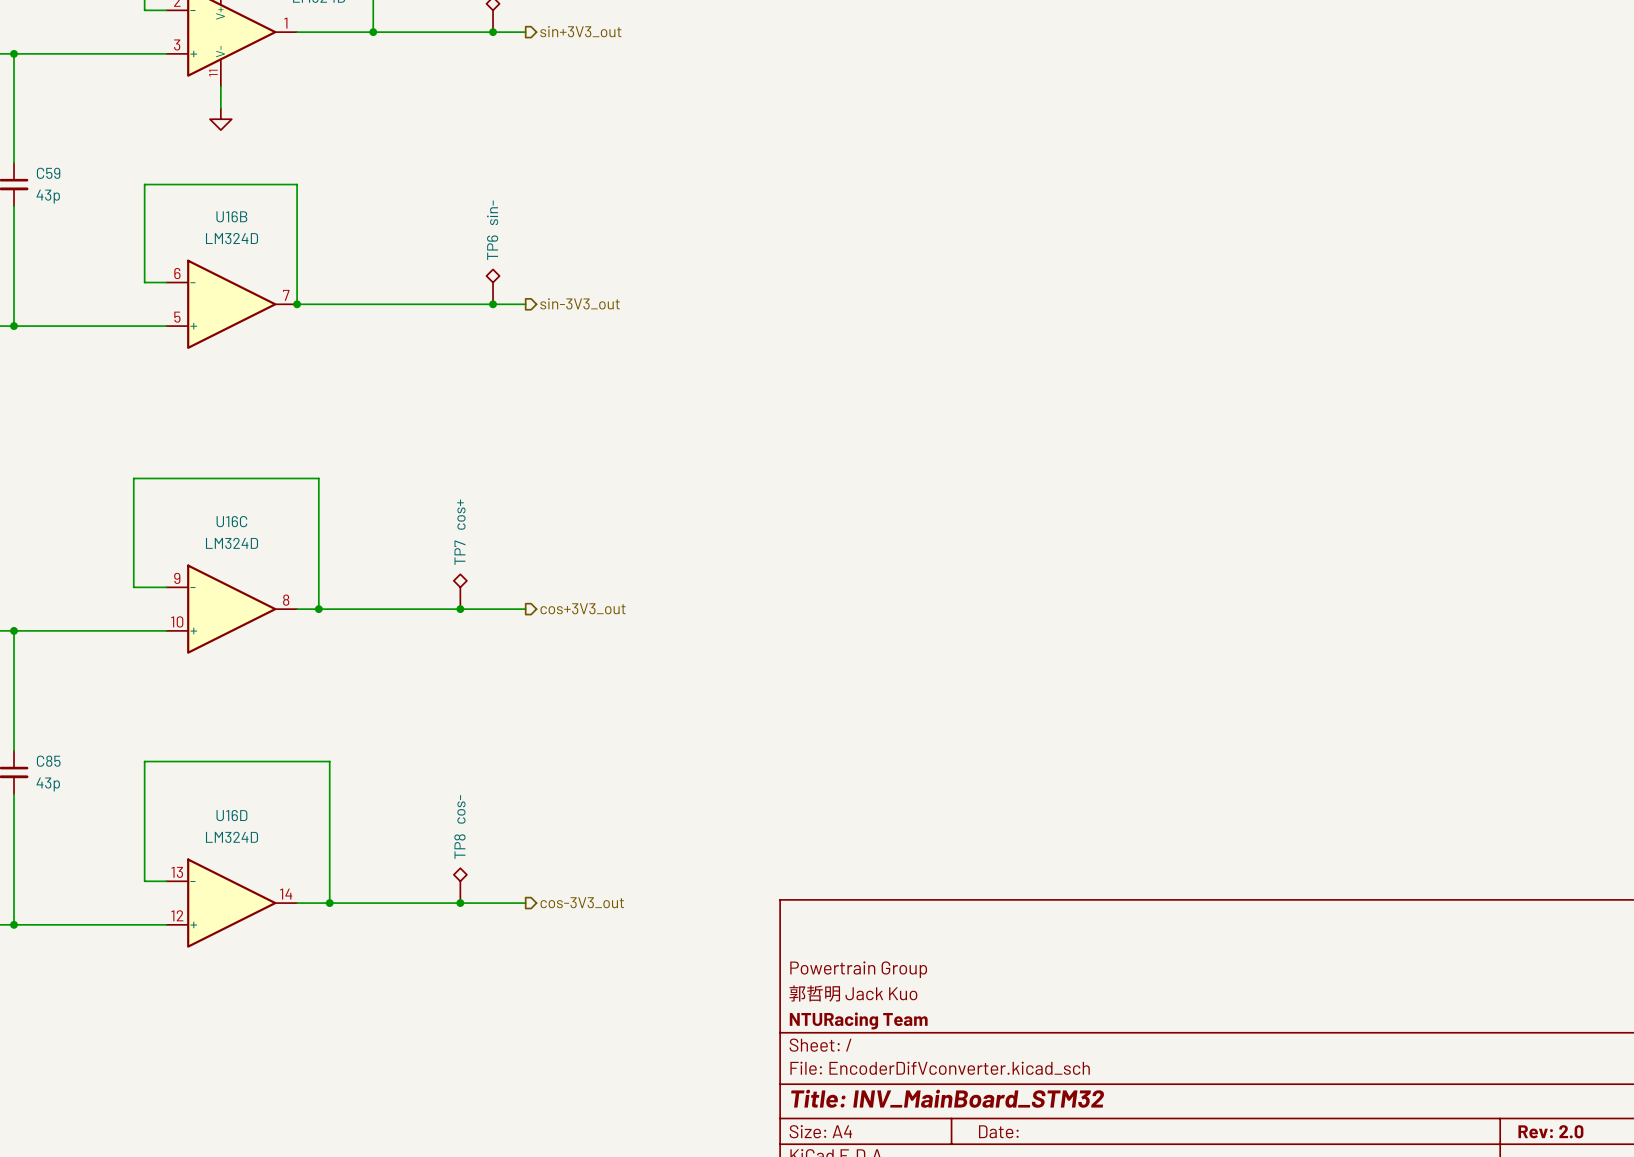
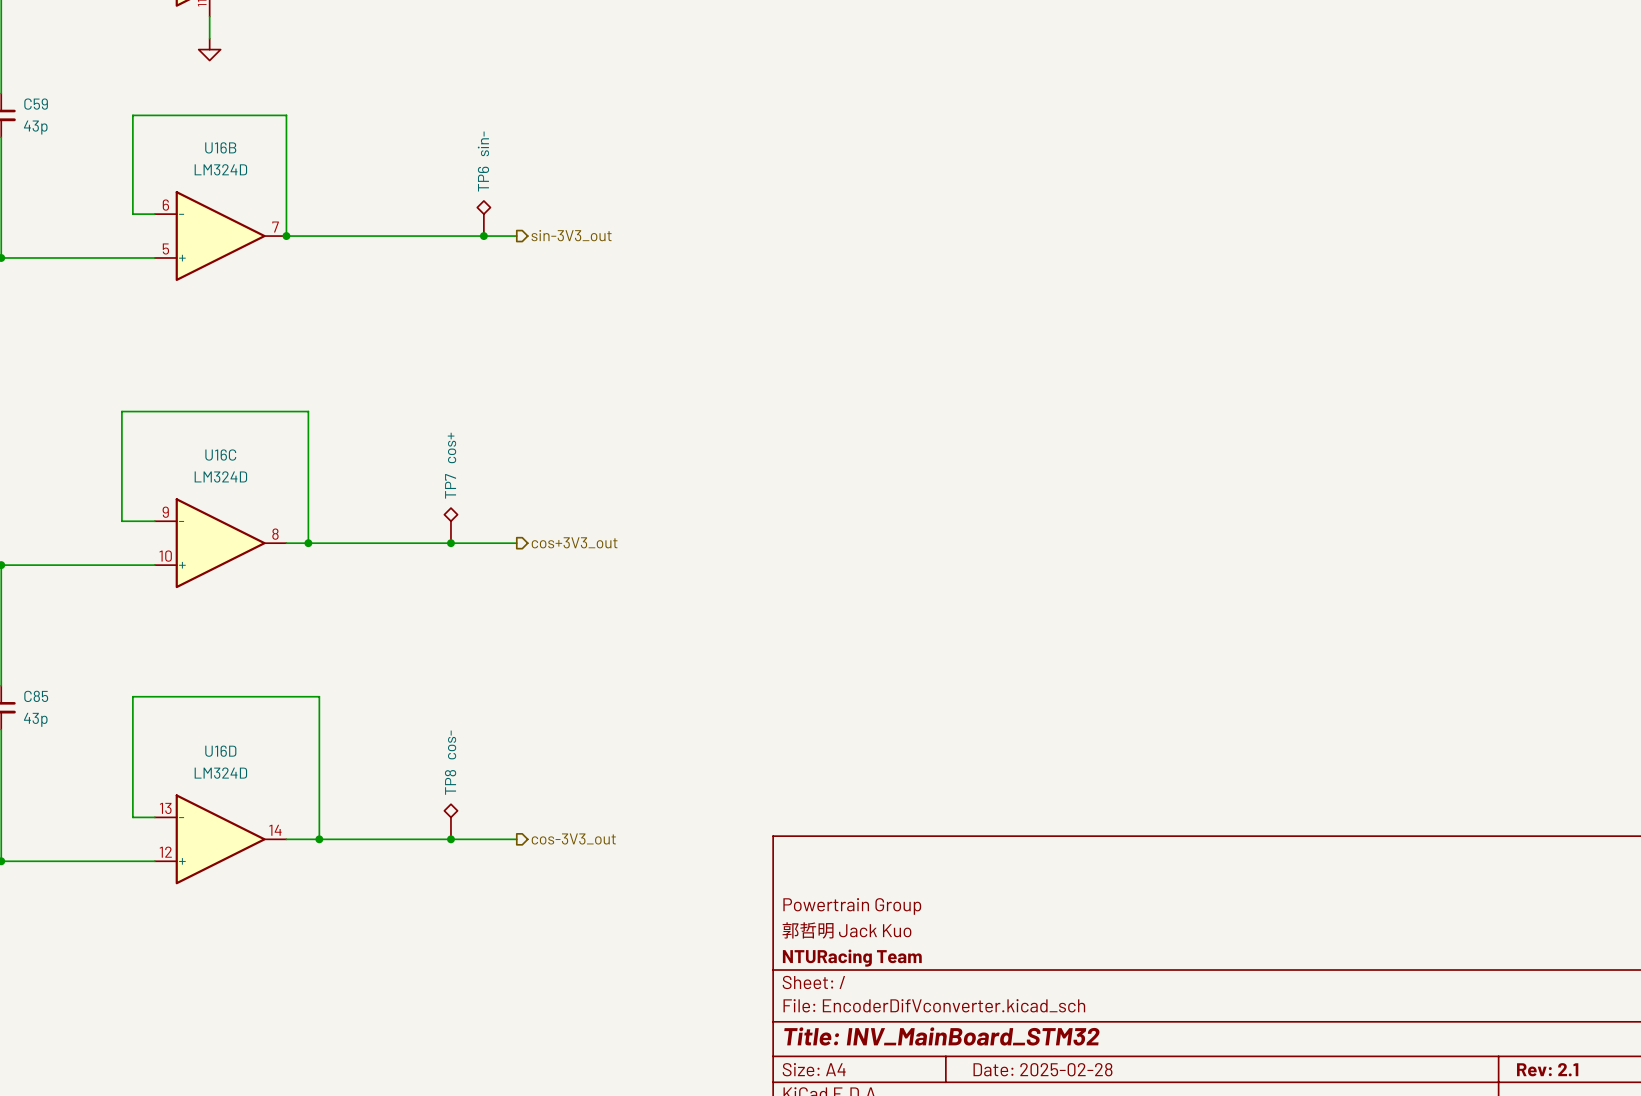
title block: Date: (998, 1131) -> Date: 2025-02-28 (1042, 1069)
title block: Rev: 2.0 (1550, 1131) -> Rev: 2.1 (1547, 1069)

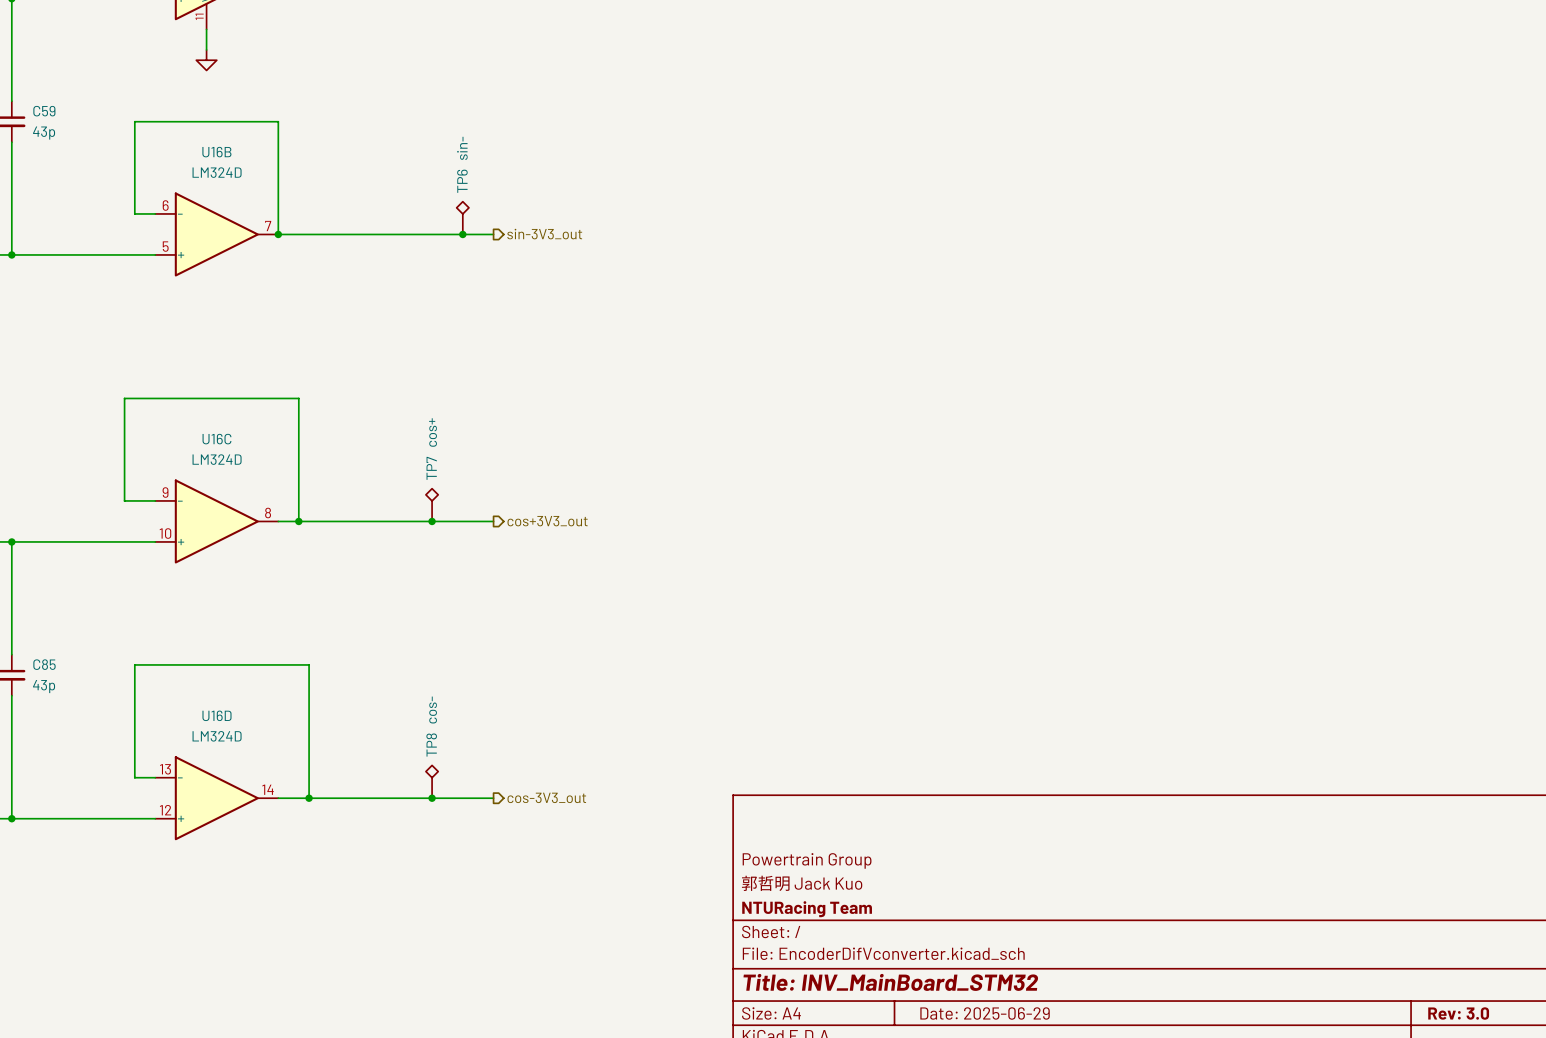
title block: Date: 2025-02-28 (1042, 1069) -> Date: 2025-06-29 (985, 1013)
title block: Rev: 2.1 (1547, 1069) -> Rev: 3.0 (1458, 1013)

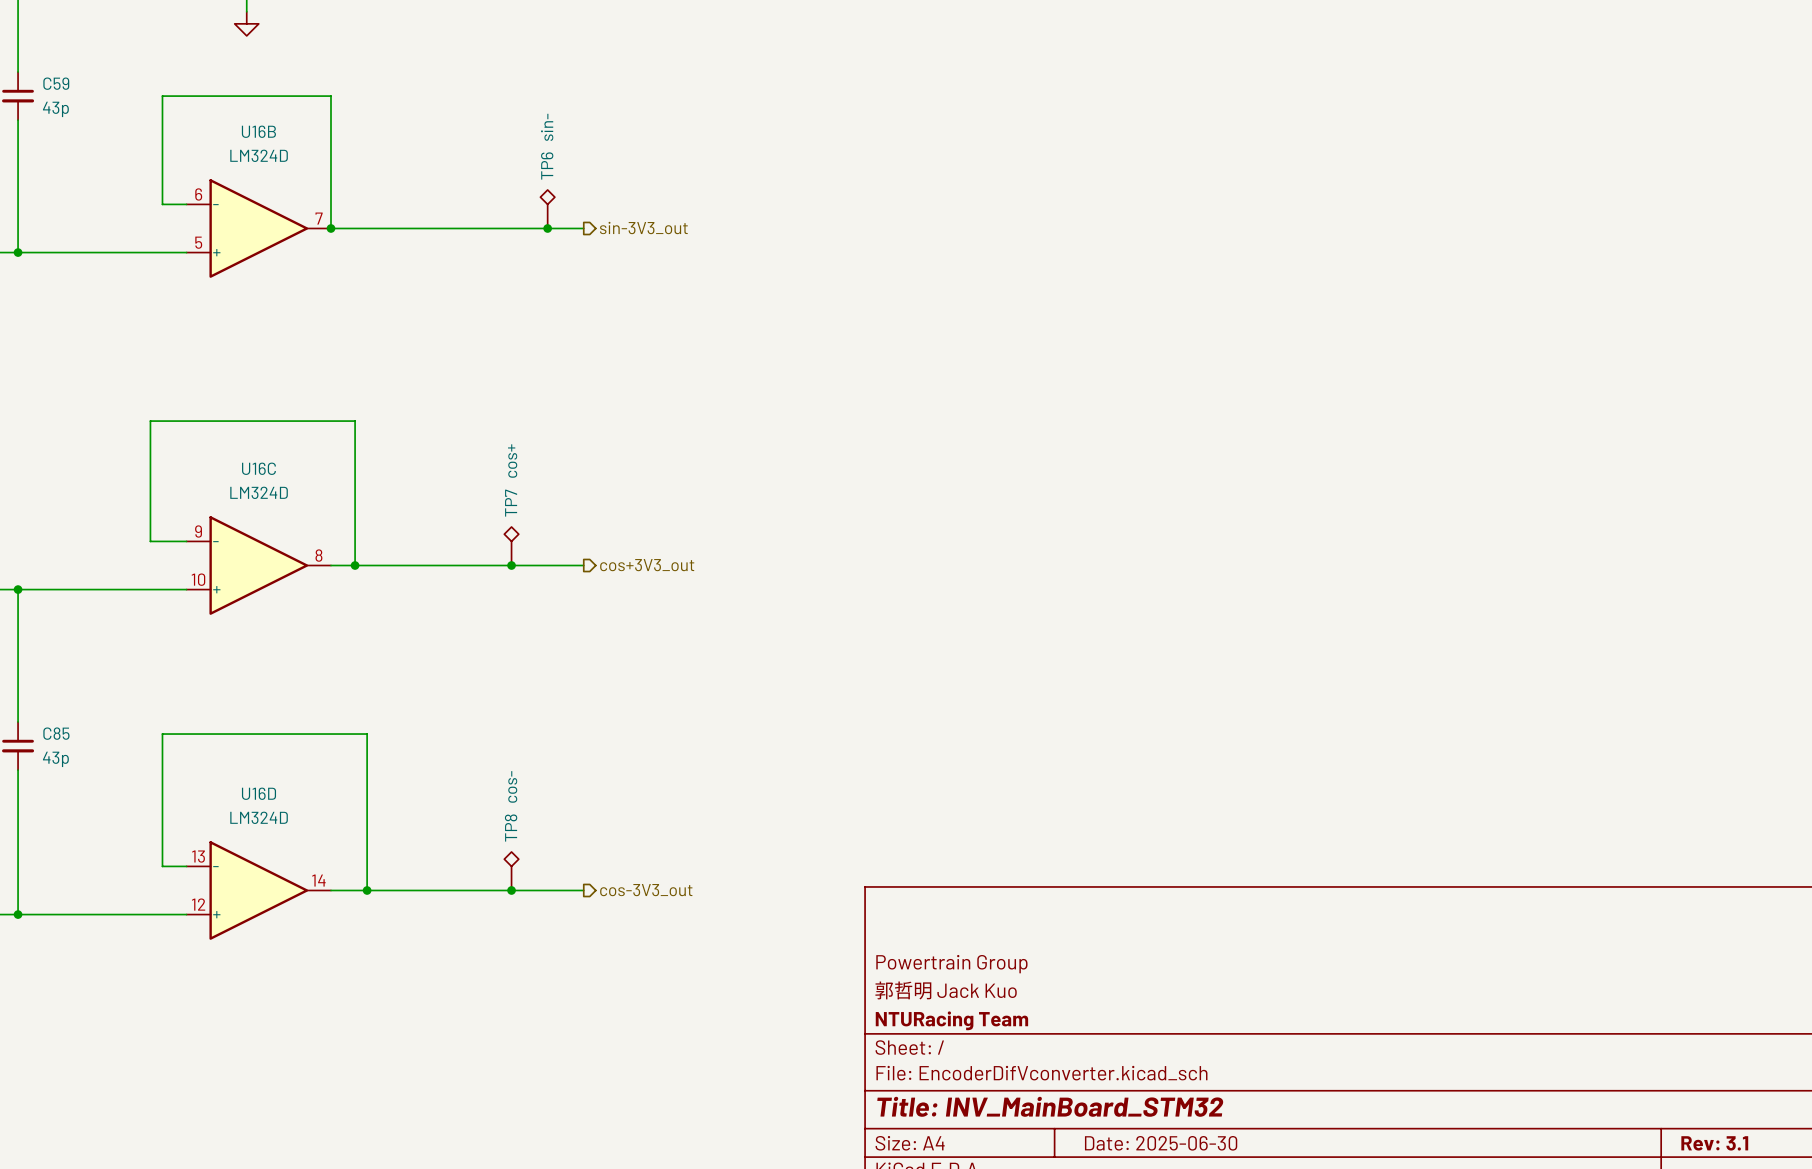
title block: Date: 2025-06-29 (985, 1013) -> Date: 2025-06-30 (1161, 1143)
title block: Rev: 3.0 (1458, 1013) -> Rev: 3.1 (1714, 1143)

